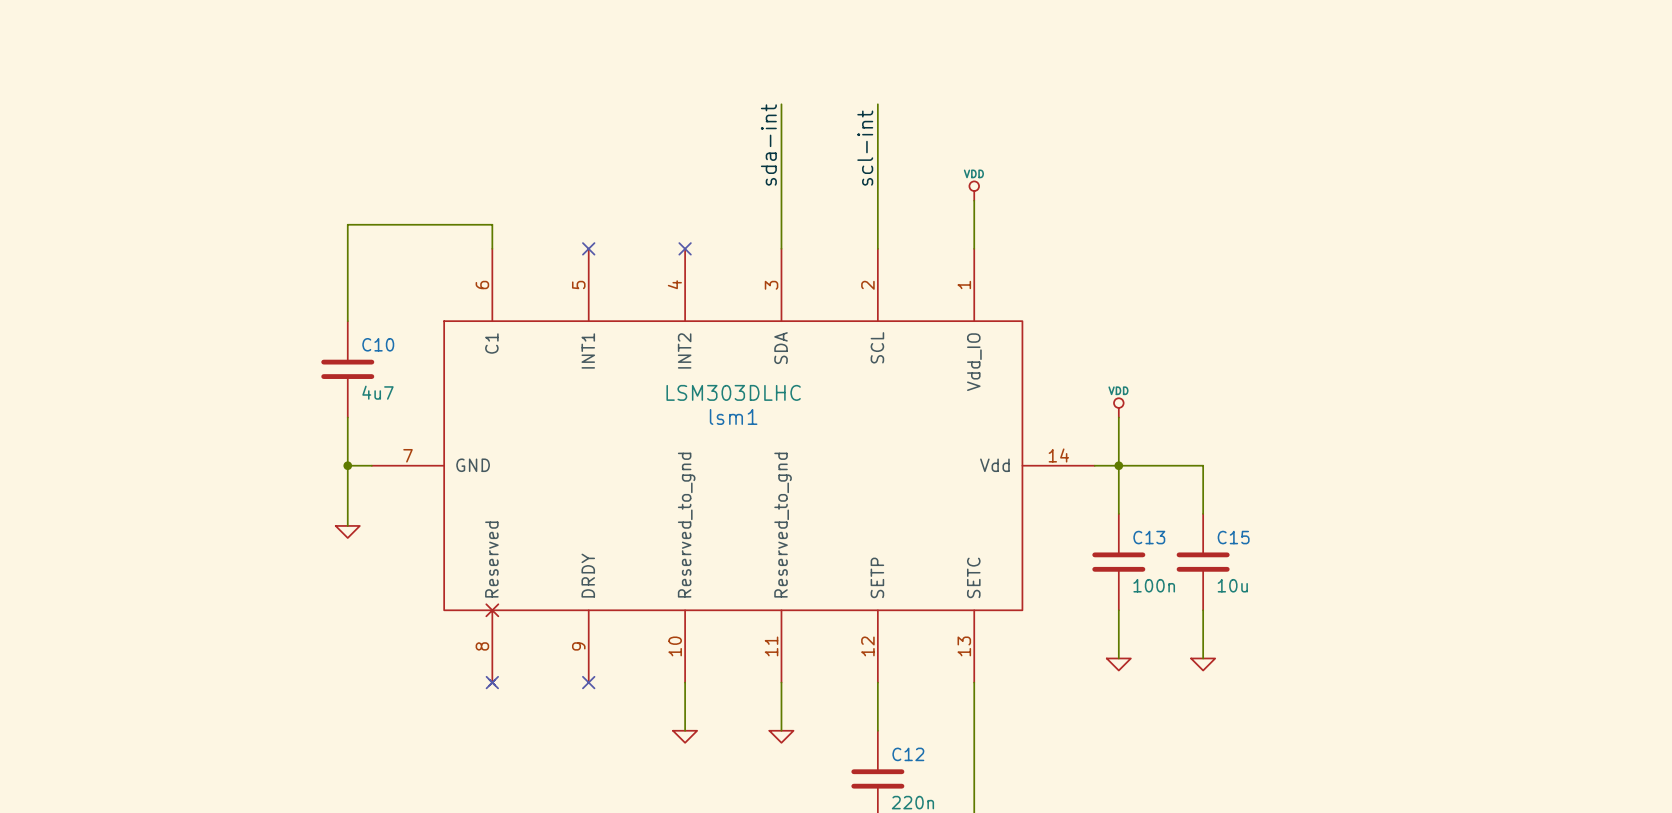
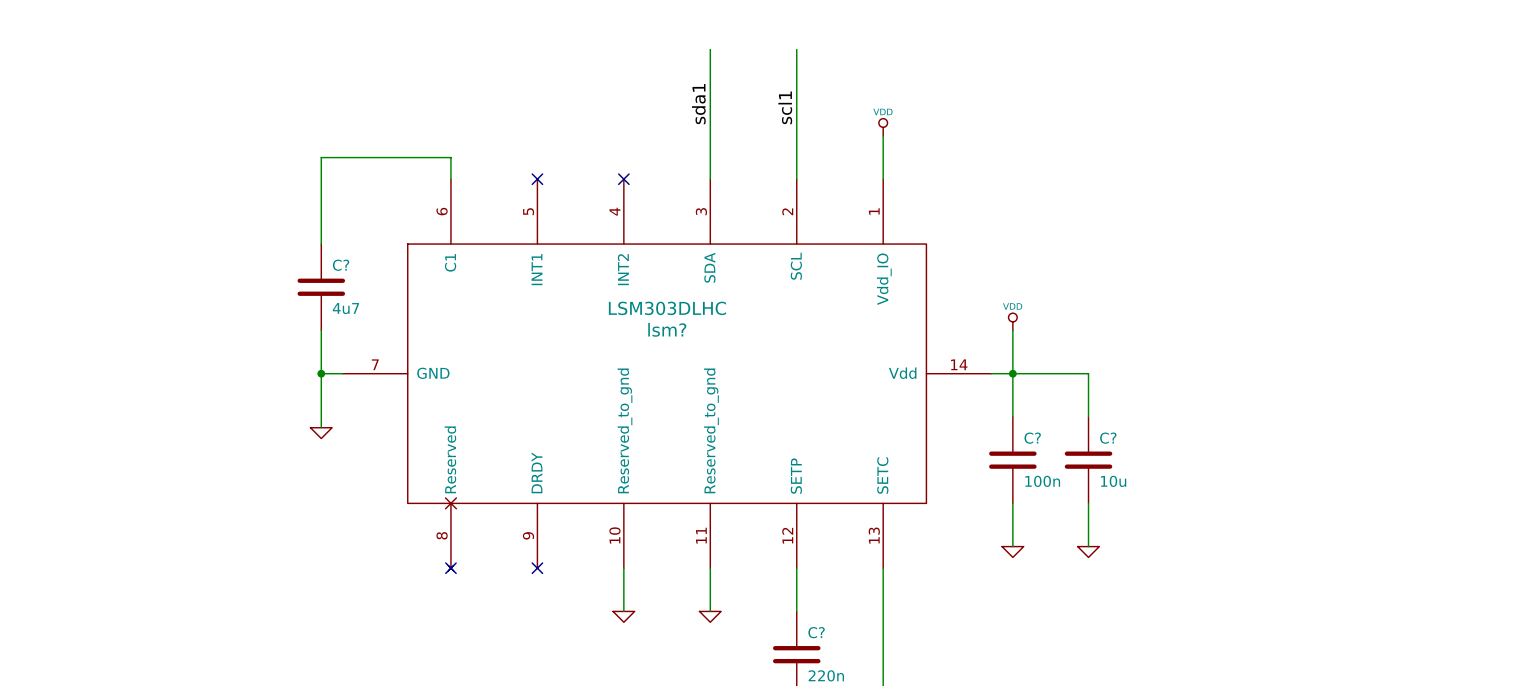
label: sda-int (768, 144) -> sda1 (698, 104)
label: scl-int (865, 148) -> scl1 (785, 107)
C10 name: C10 (378, 344) -> C? (341, 265)
lsm1 name: lsm1 (733, 416) -> lsm? (667, 329)
C13 name: C13 (1149, 537) -> C? (1032, 438)
C15 name: C15 (1233, 537) -> C? (1108, 438)
C12 name: C12 (908, 754) -> C? (816, 632)

